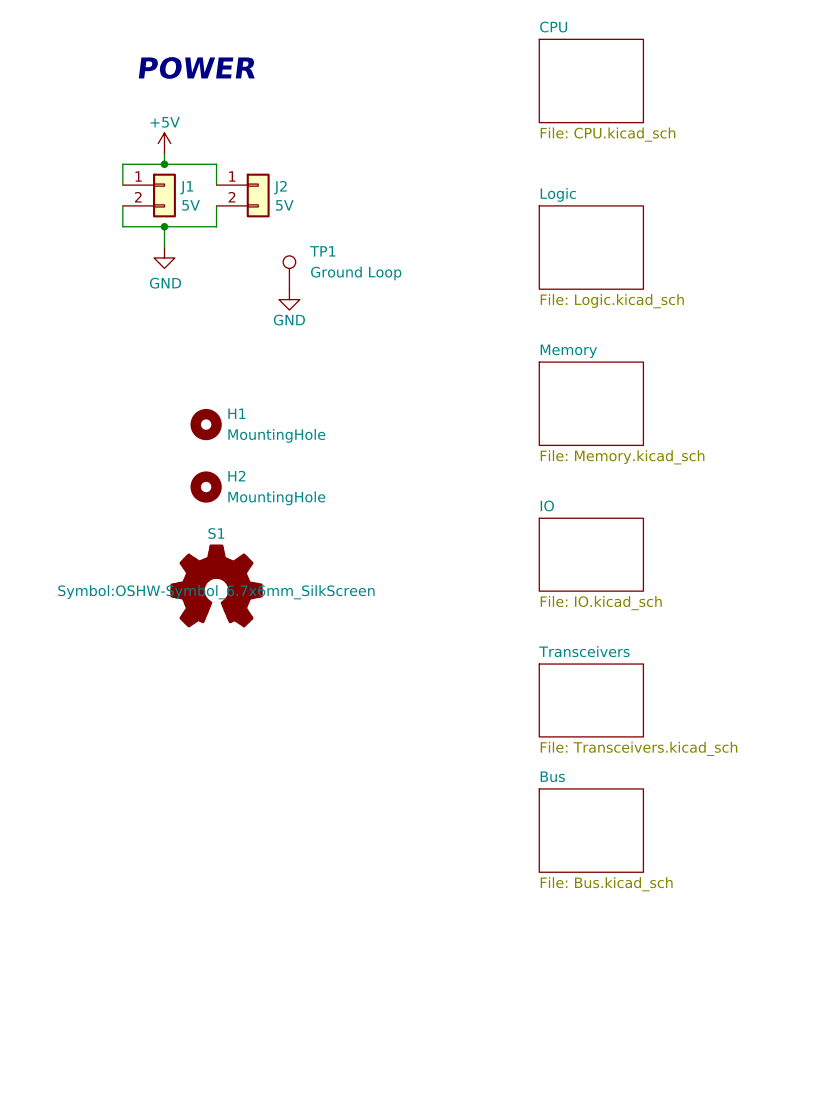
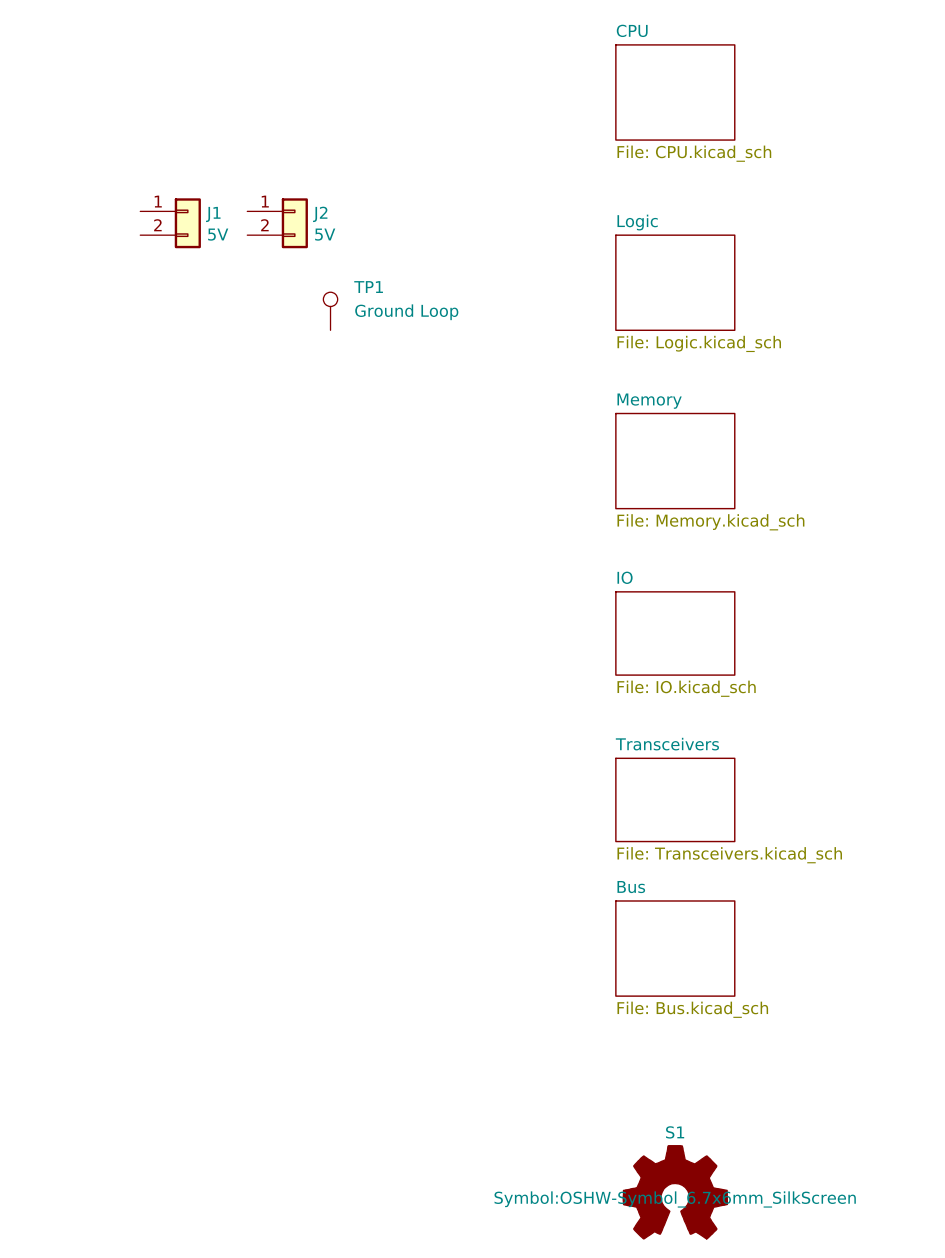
text: POWER (196, 67) -> none
power symbol: +5V (164, 143) -> none
wire: (164, 153) (164, 164) -> none
junction: (164, 164) -> none
wire: (122, 185) (122, 164) (216, 164) (216, 185) -> none
wire: (122, 205) (122, 226) (216, 226) (216, 205) -> none
wire: (164, 226) (164, 247) -> none
junction: (164, 226) -> none
power symbol: GND (164, 257) -> none
power symbol: GND (289, 299) -> none
H1: MountingHole (206, 424) -> none
H2: MountingHole (206, 487) -> none
S1 position: (216, 585) -> (675, 1192)

